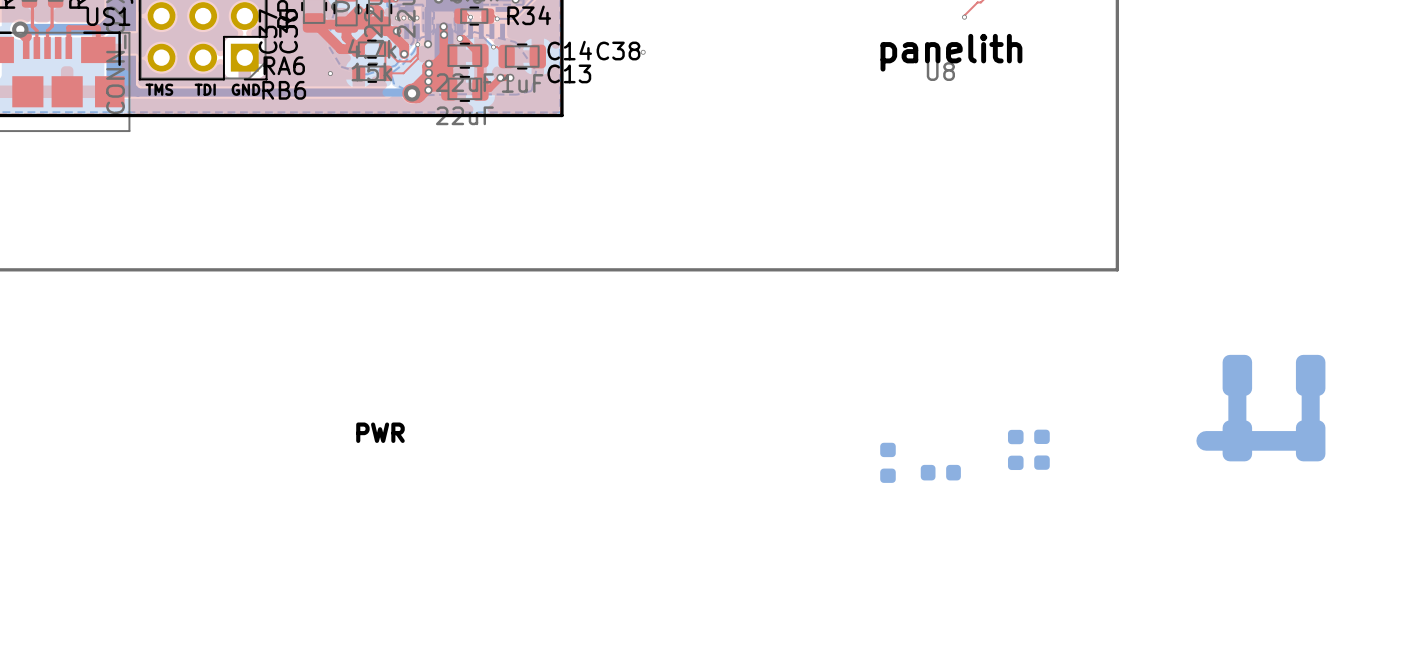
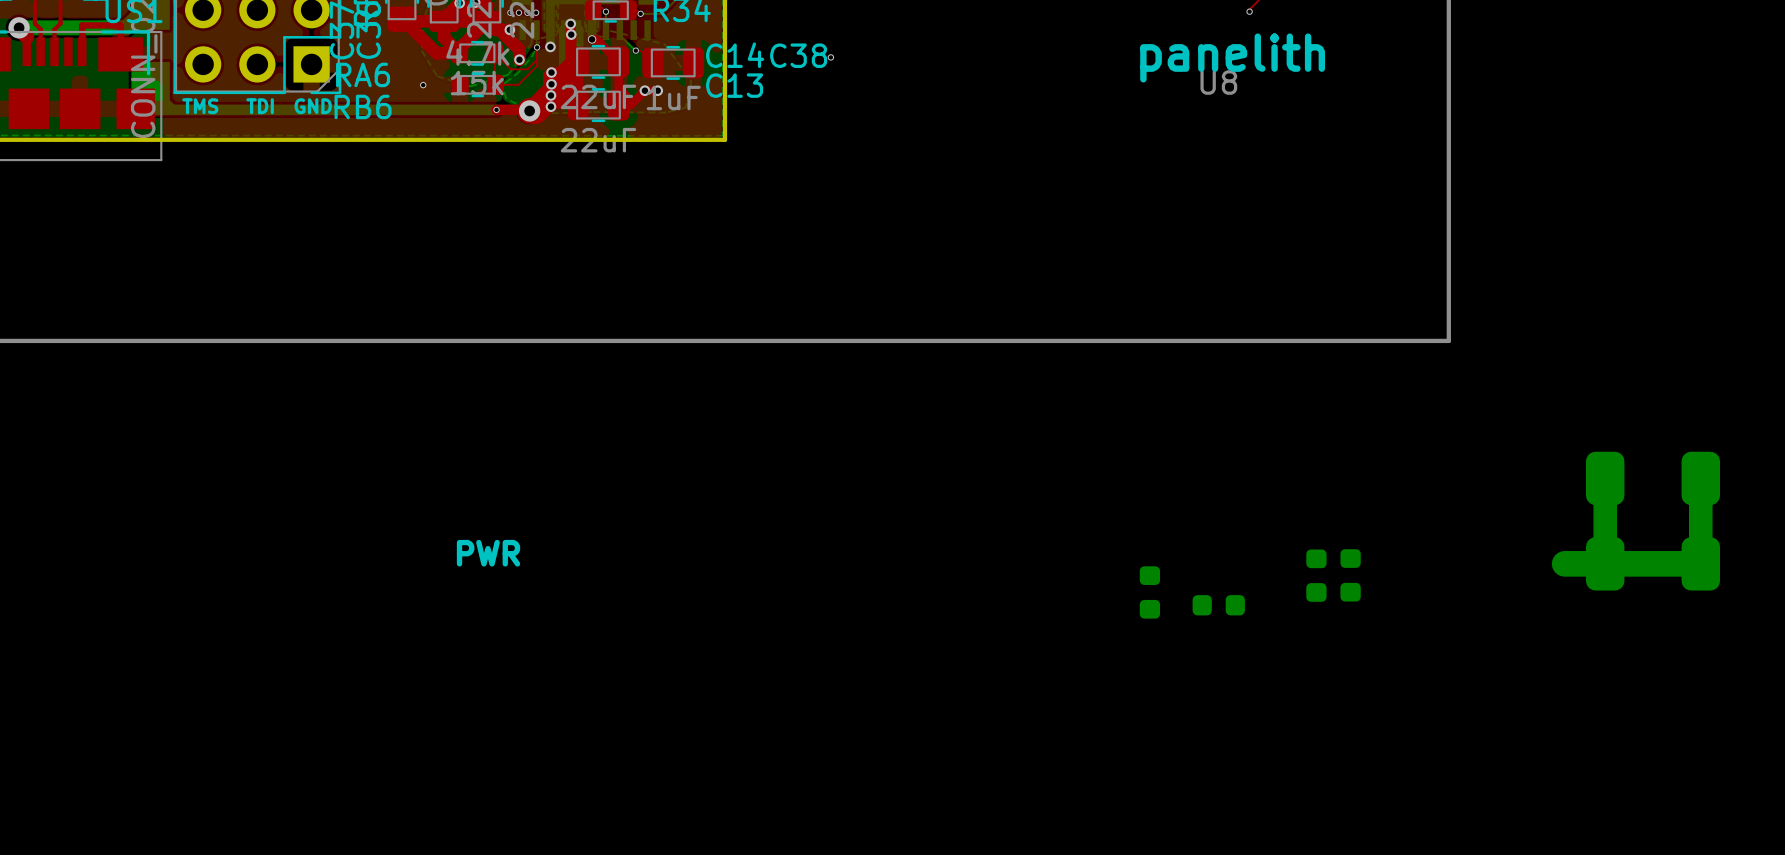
top track: none -> (496, 109) (534, 109)
bottom track: (386, 92) (412, 93) -> none
via: none -> (496, 109)

